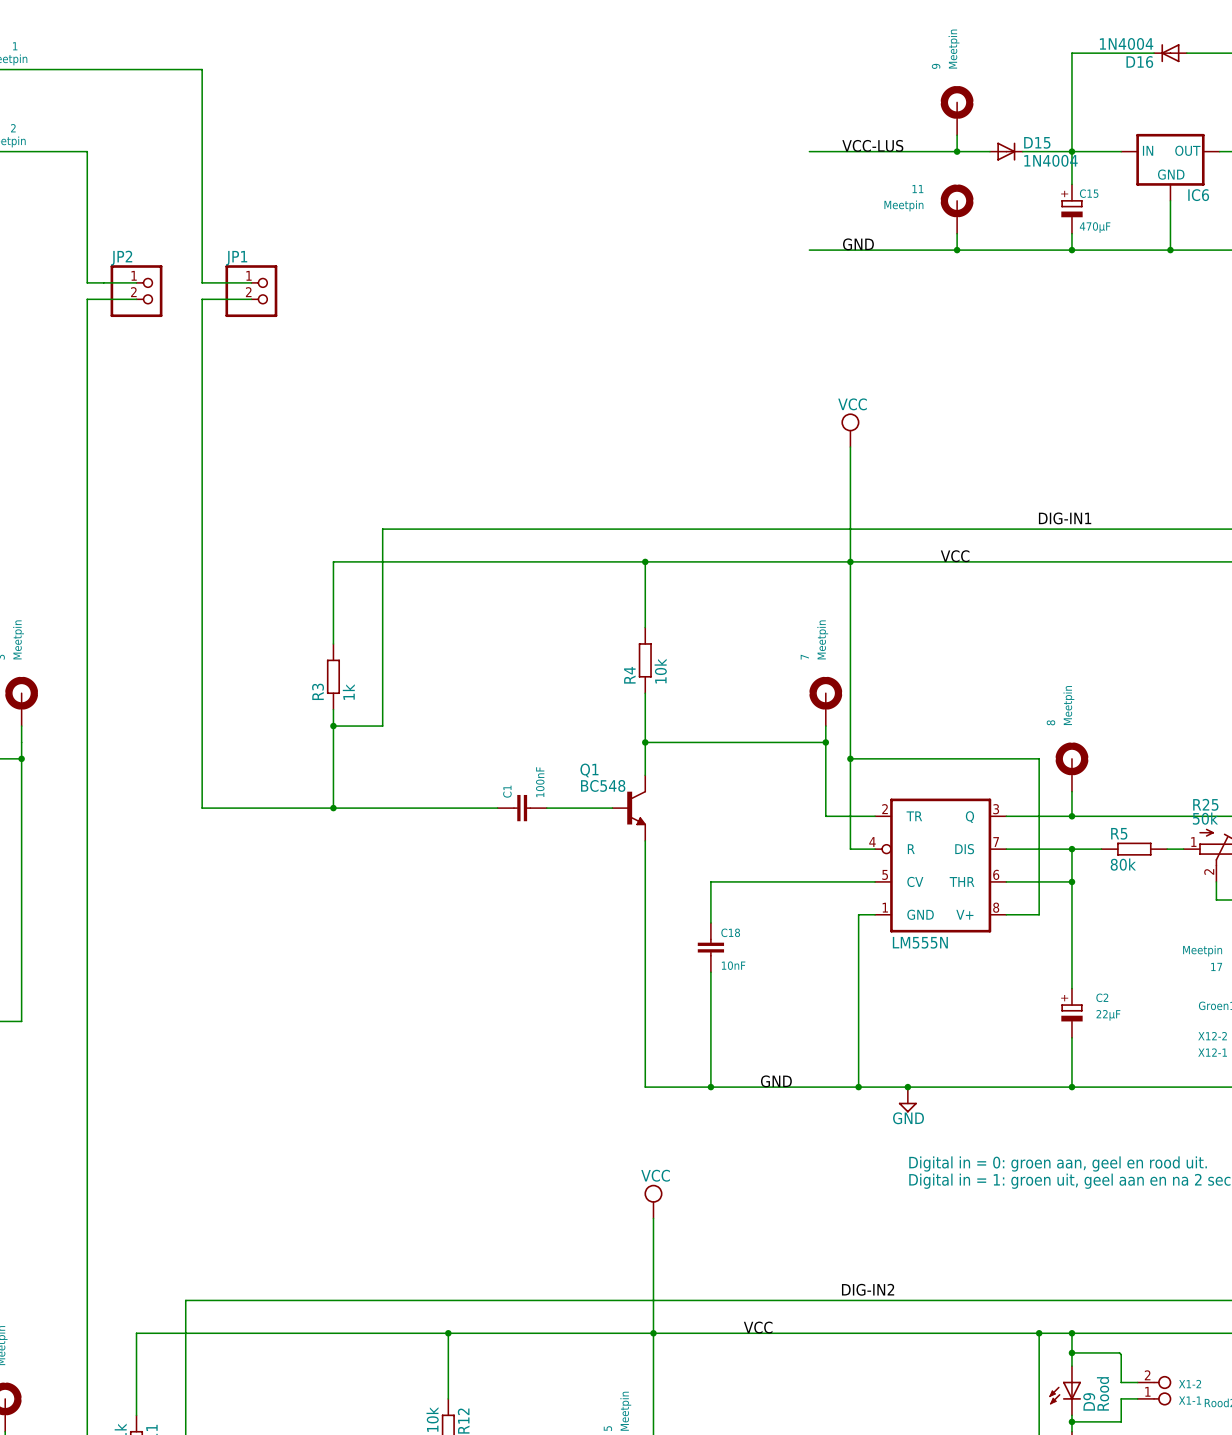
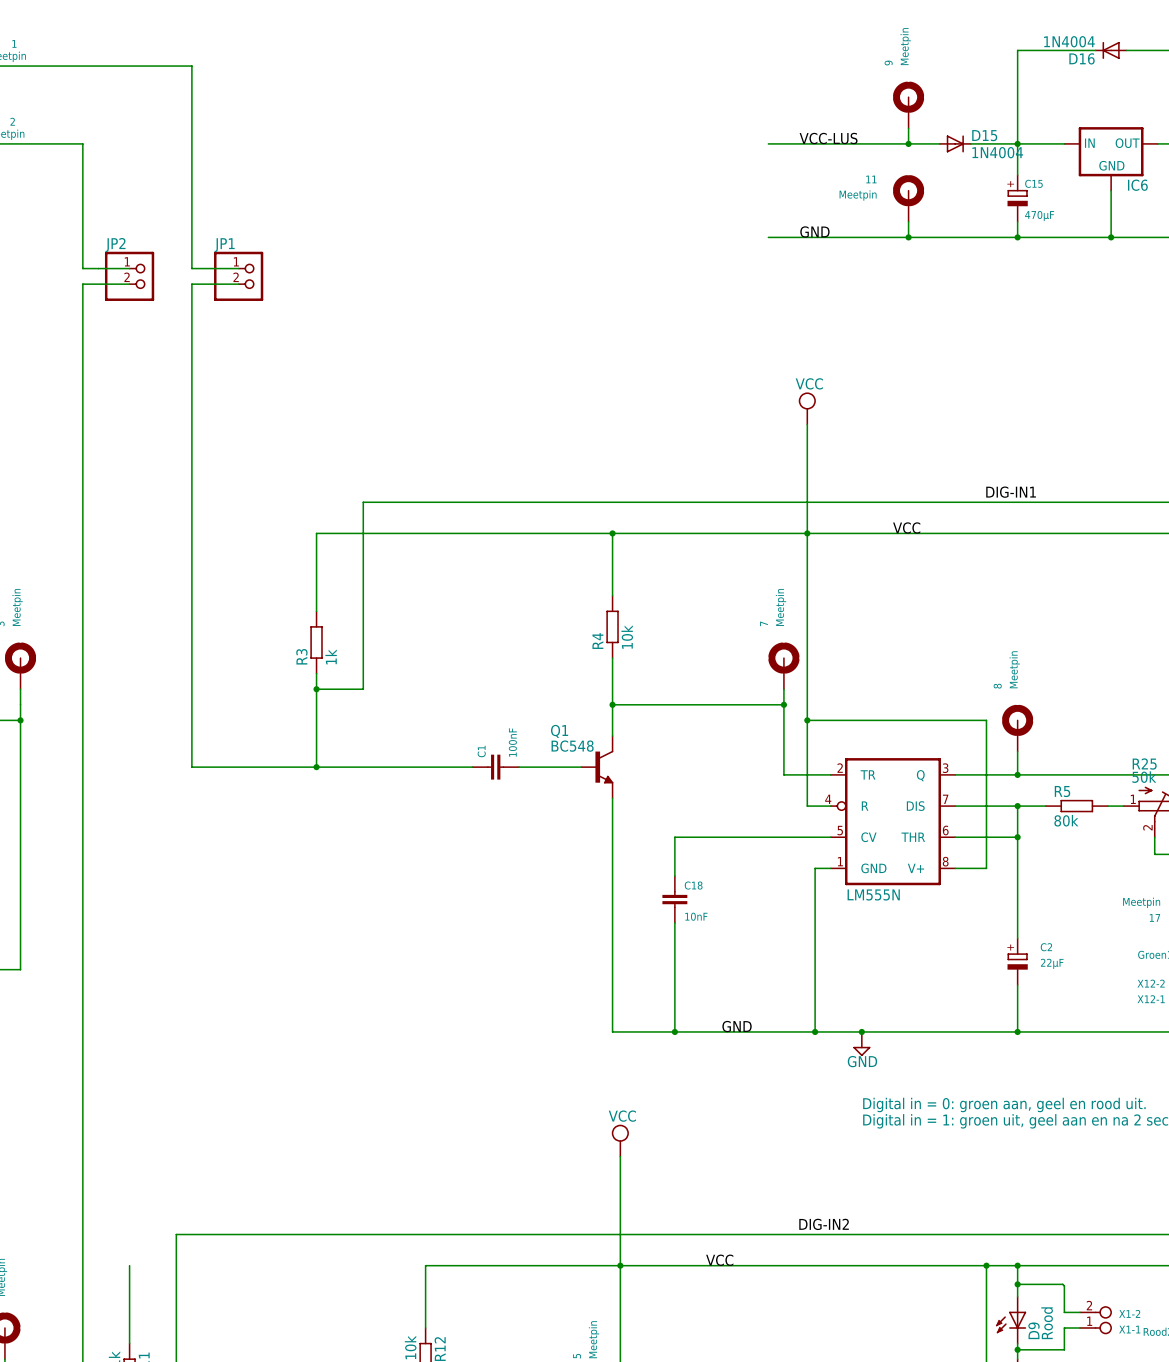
wire: (136, 1333) (448, 1333) -> none
junction: (448, 1333) -> none

